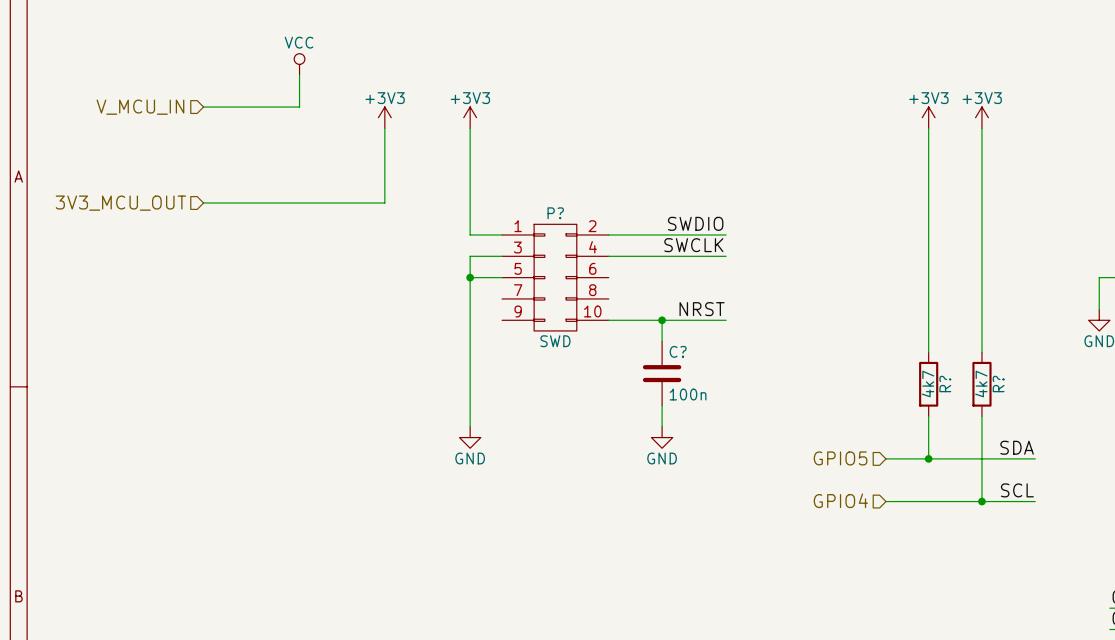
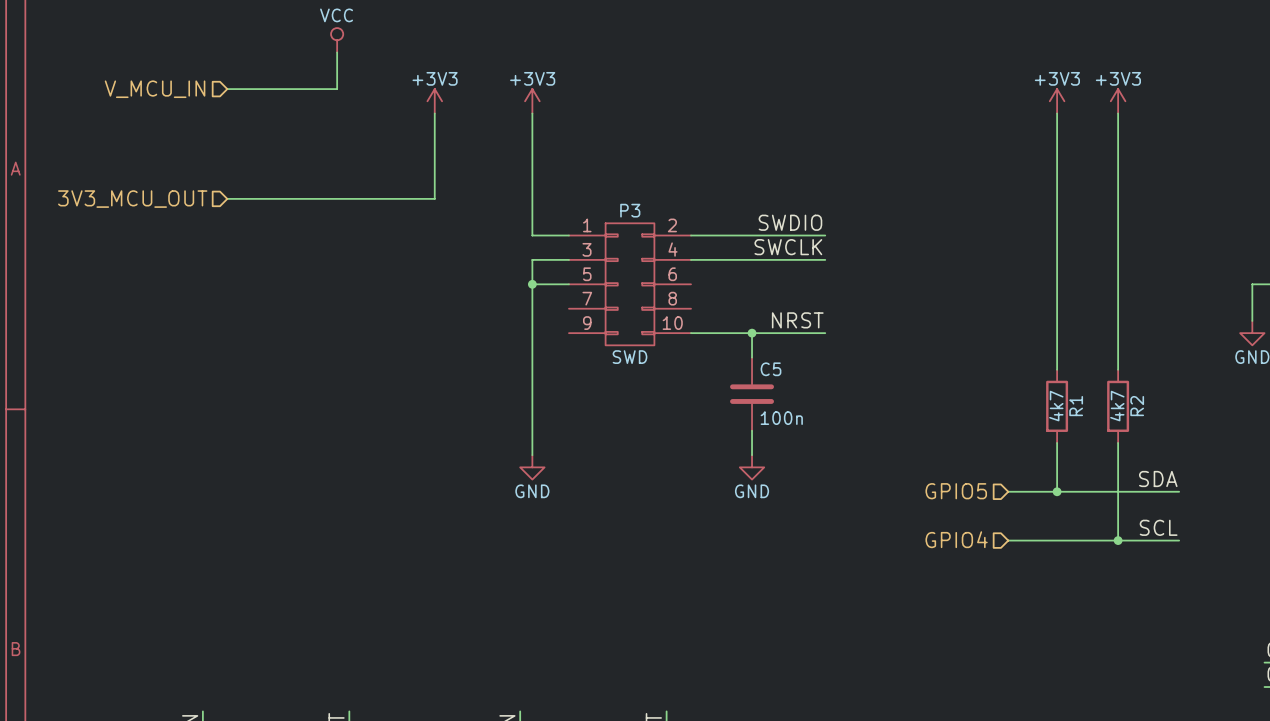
P? name: P? (555, 213) -> P3 (630, 210)
C? name: C? (678, 351) -> C5 (771, 369)
R? name: R? (945, 384) -> R1 (1076, 406)
R? name: R? (998, 384) -> R2 (1137, 406)

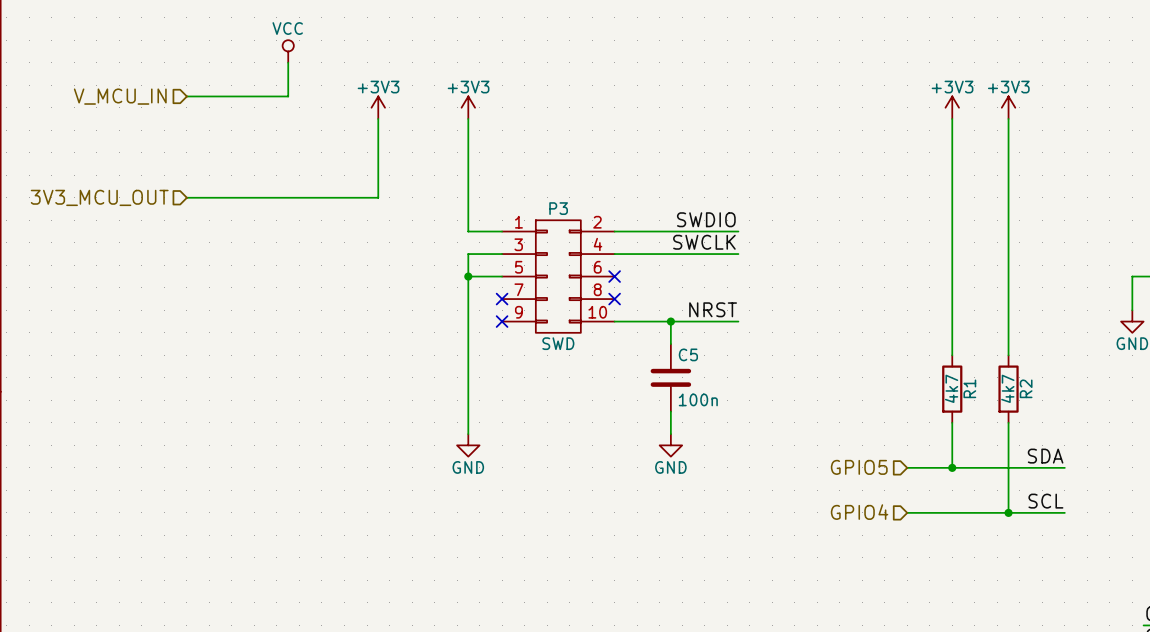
no-connect mark: none -> (614, 276)
no-connect mark: none -> (502, 299)
no-connect mark: none -> (614, 299)
no-connect mark: none -> (502, 321)

